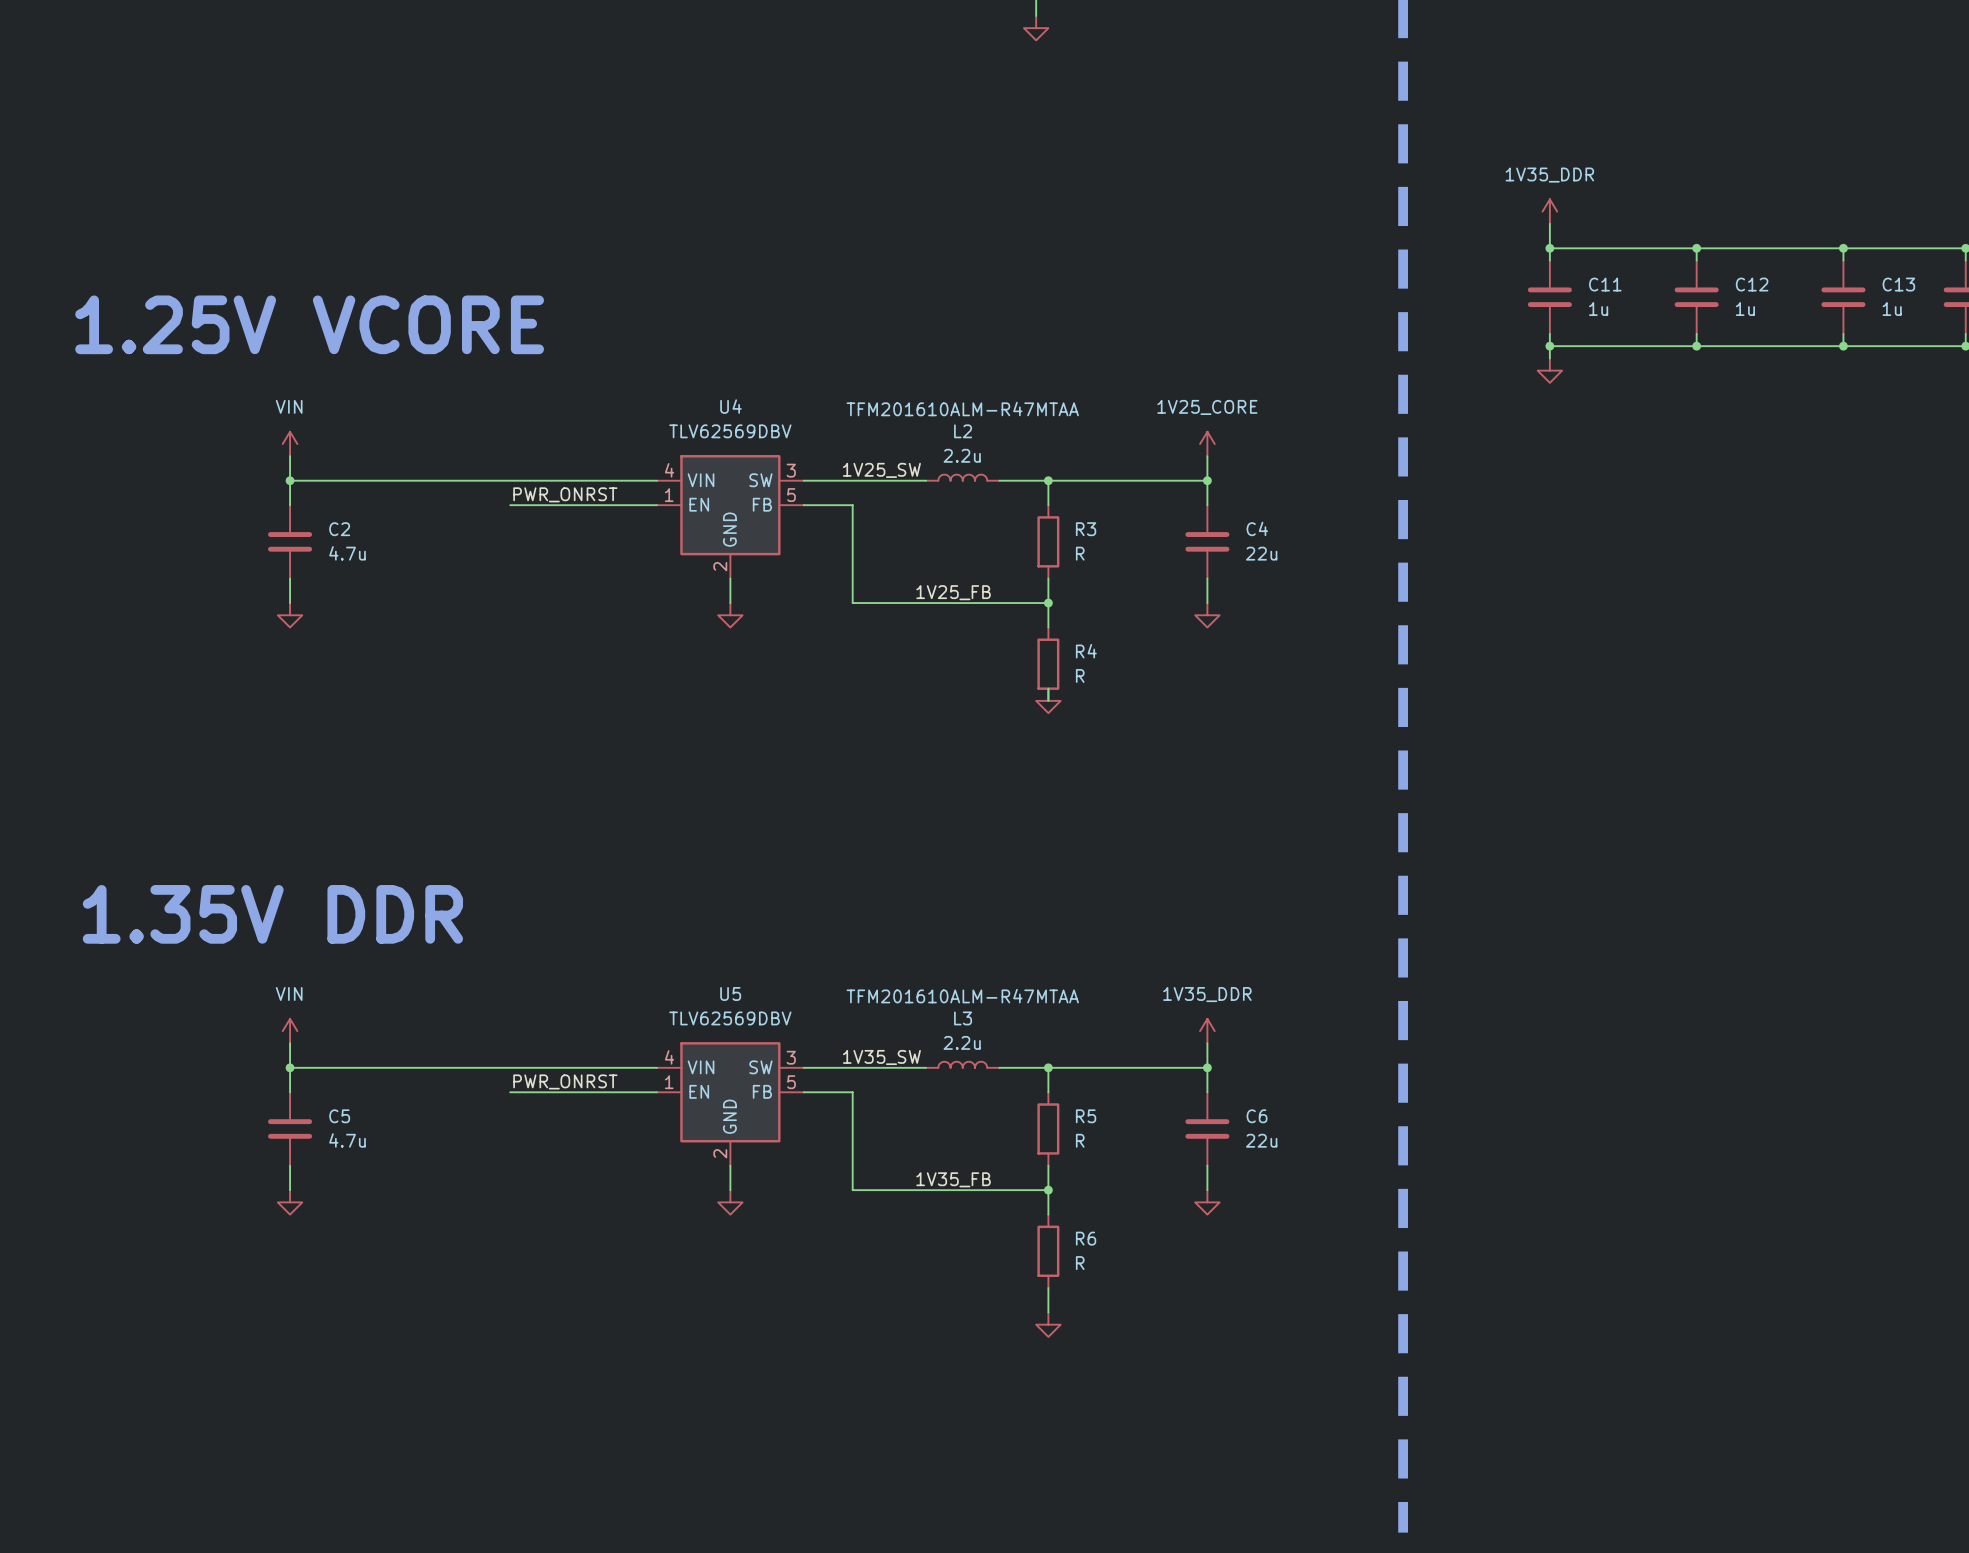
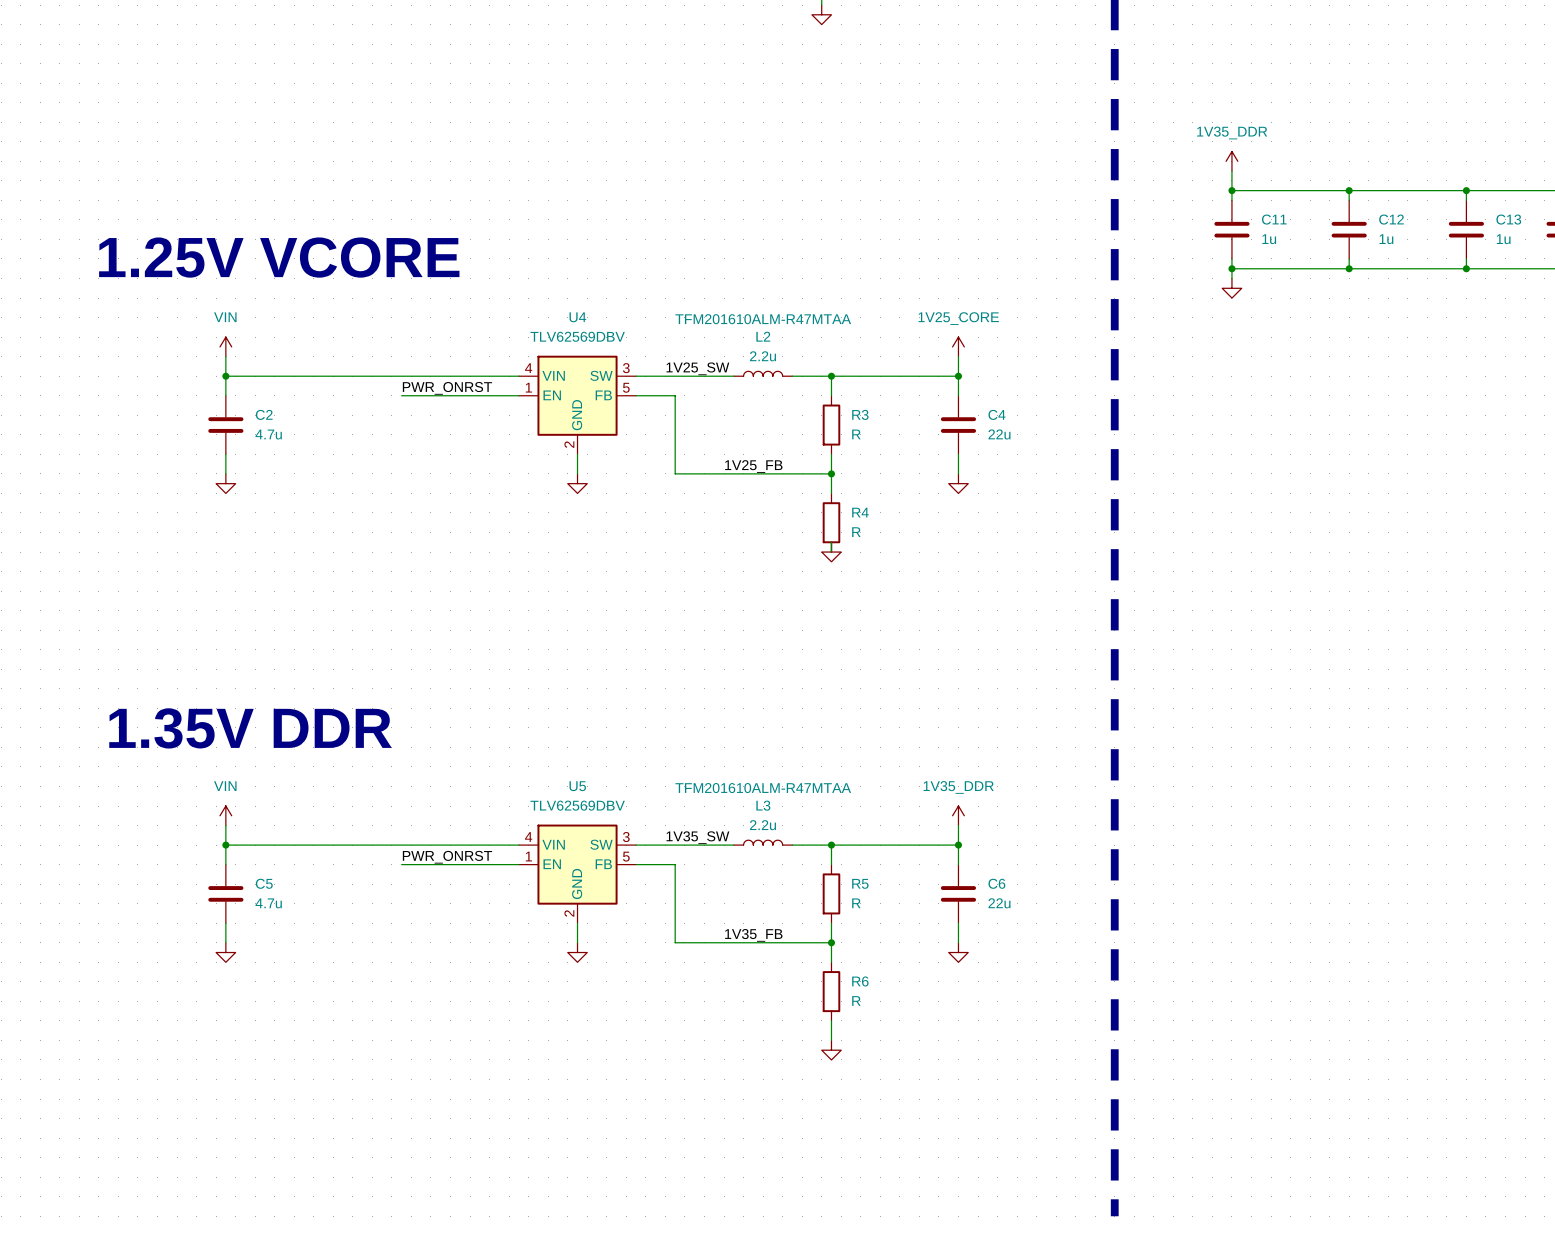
text position: 1.25V VCORE (309, 324) -> 1.25V VCORE (279, 257)
text position: 1.35V DDR (272, 914) -> 1.35V DDR (250, 728)

